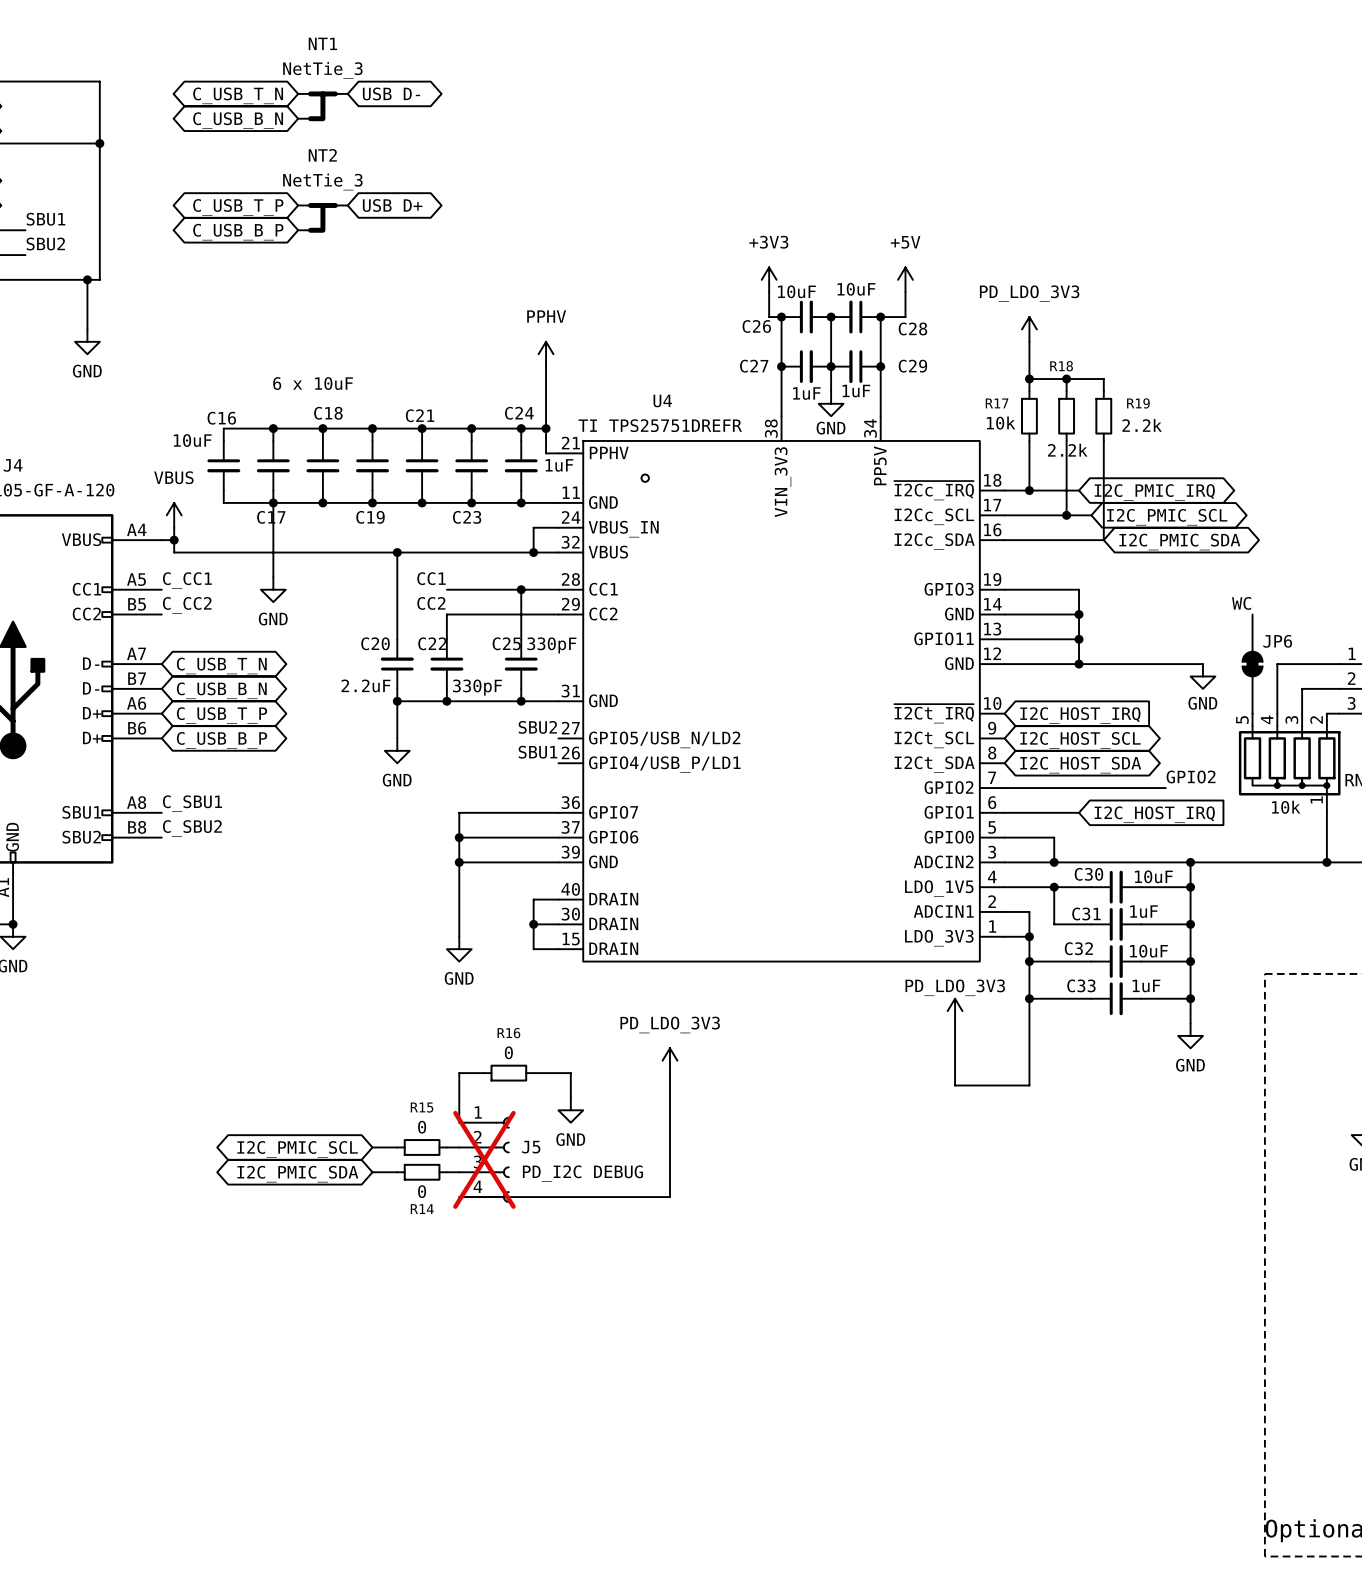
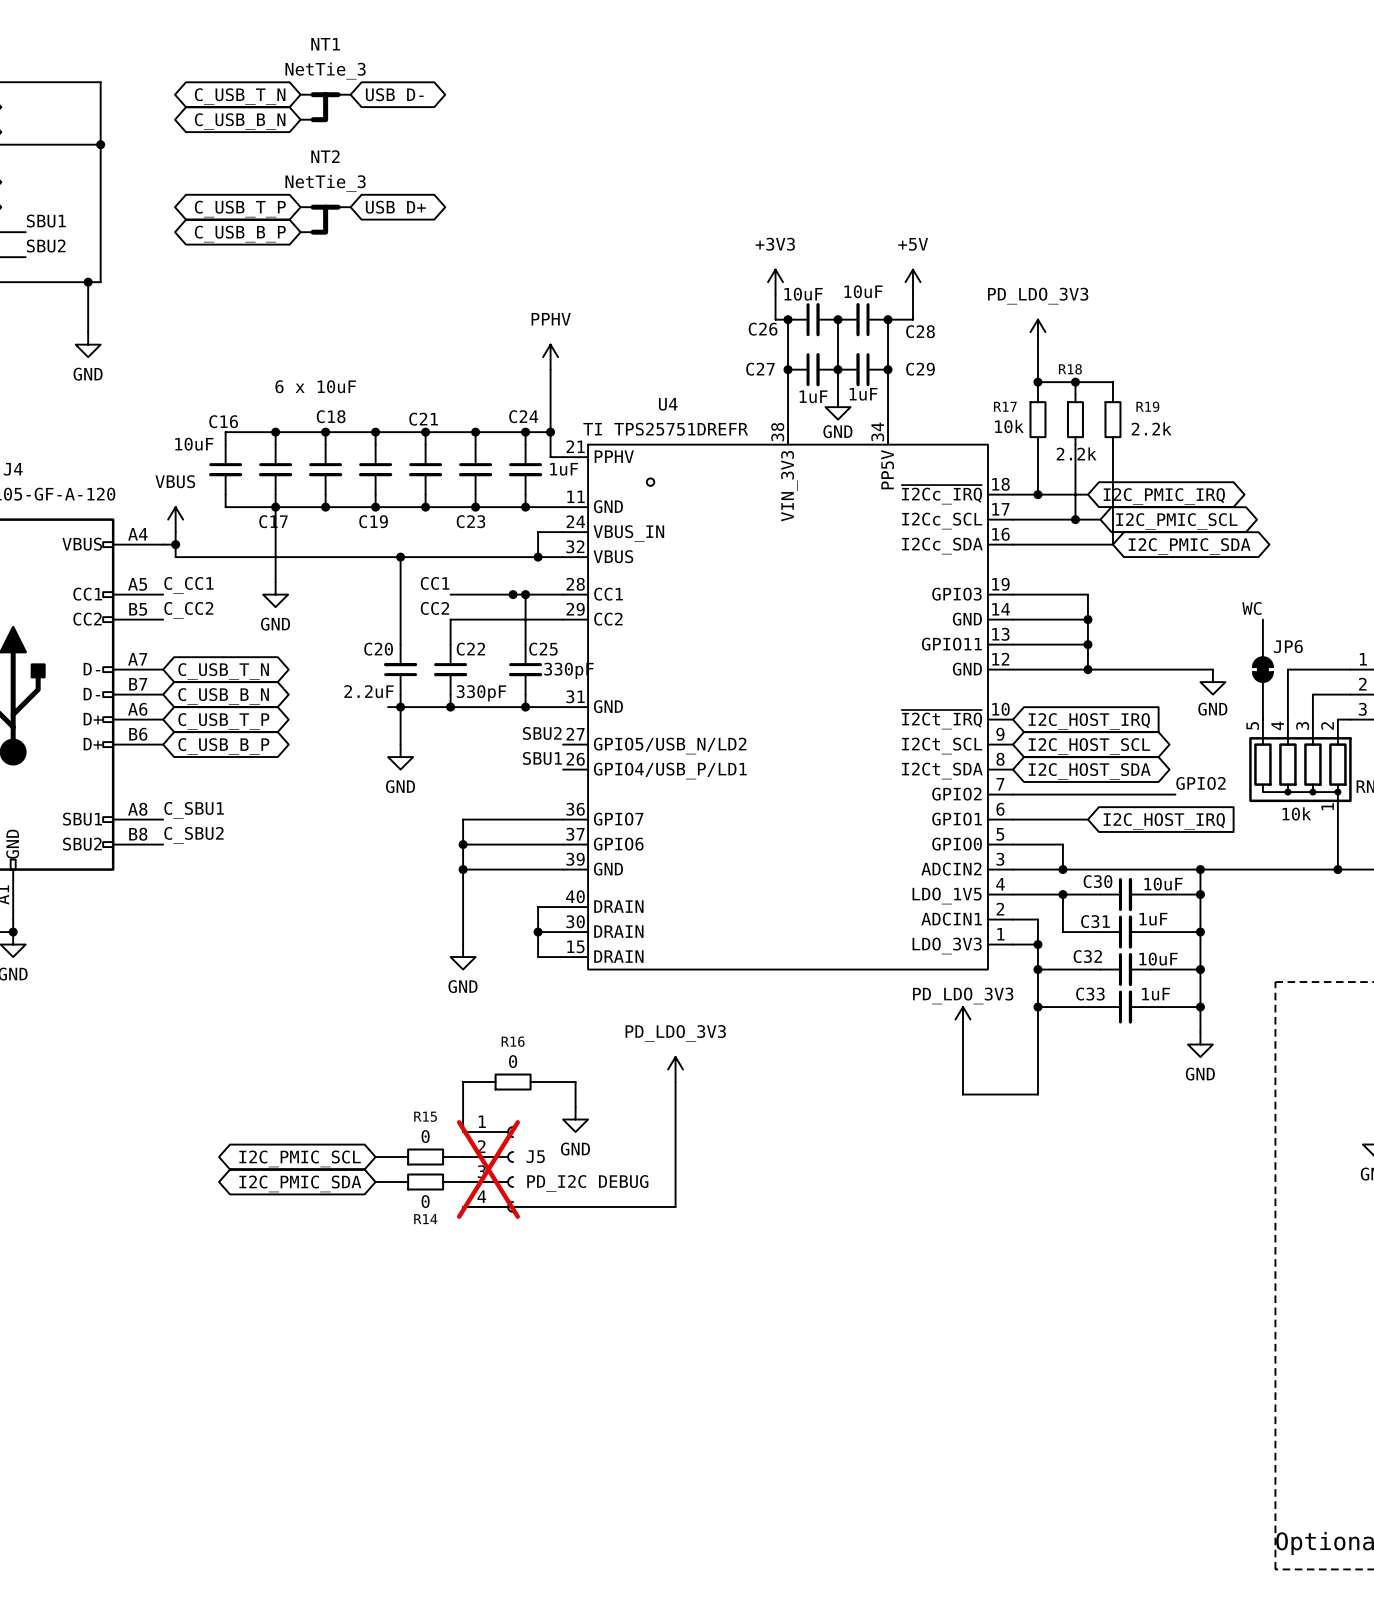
junction: none -> (513, 594)
C22 name position: C22 (432, 643) -> C22 (470, 649)
C25 name position: C25 (506, 643) -> C25 (543, 649)
C25 value position: 330pF (551, 645) -> 330pF (568, 670)
wire: none -> (388, 707) (400, 707)

